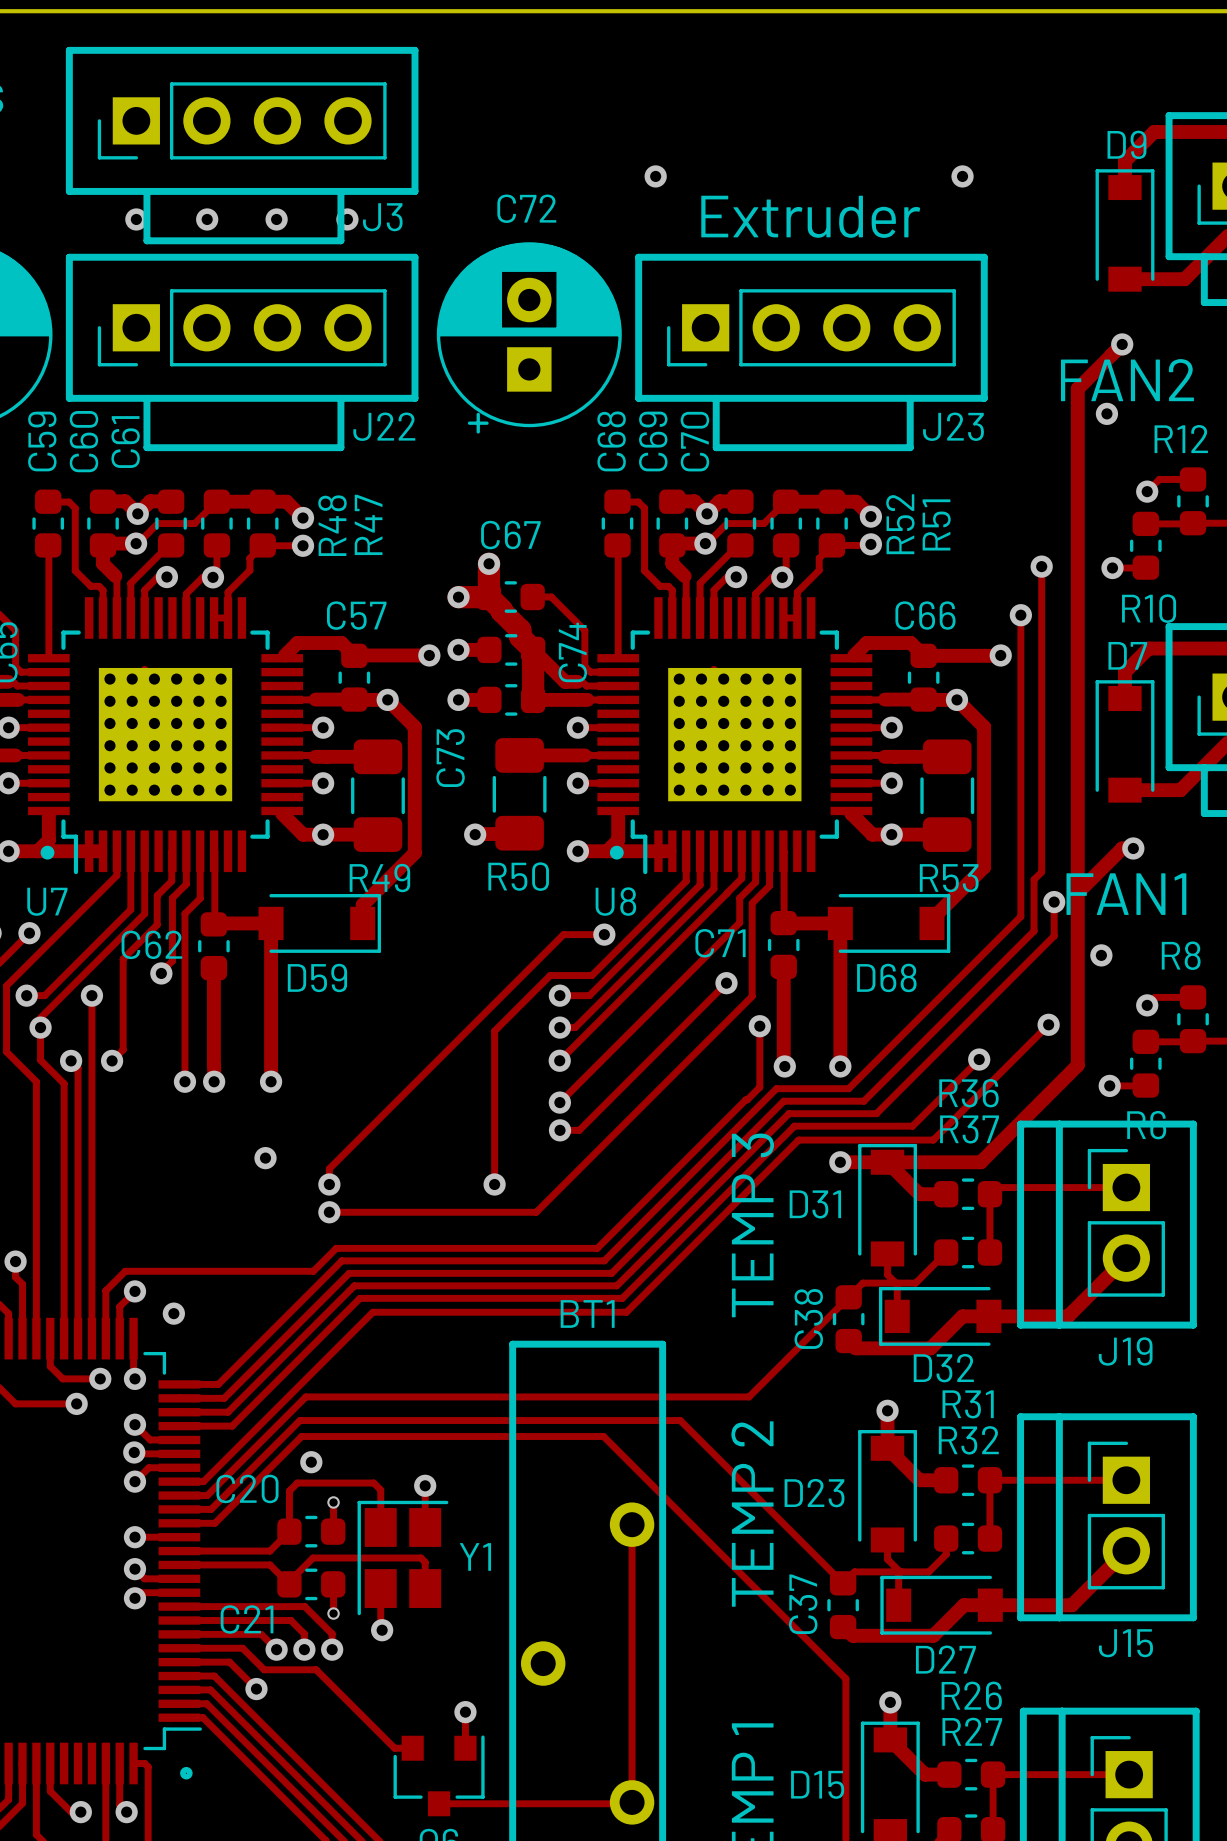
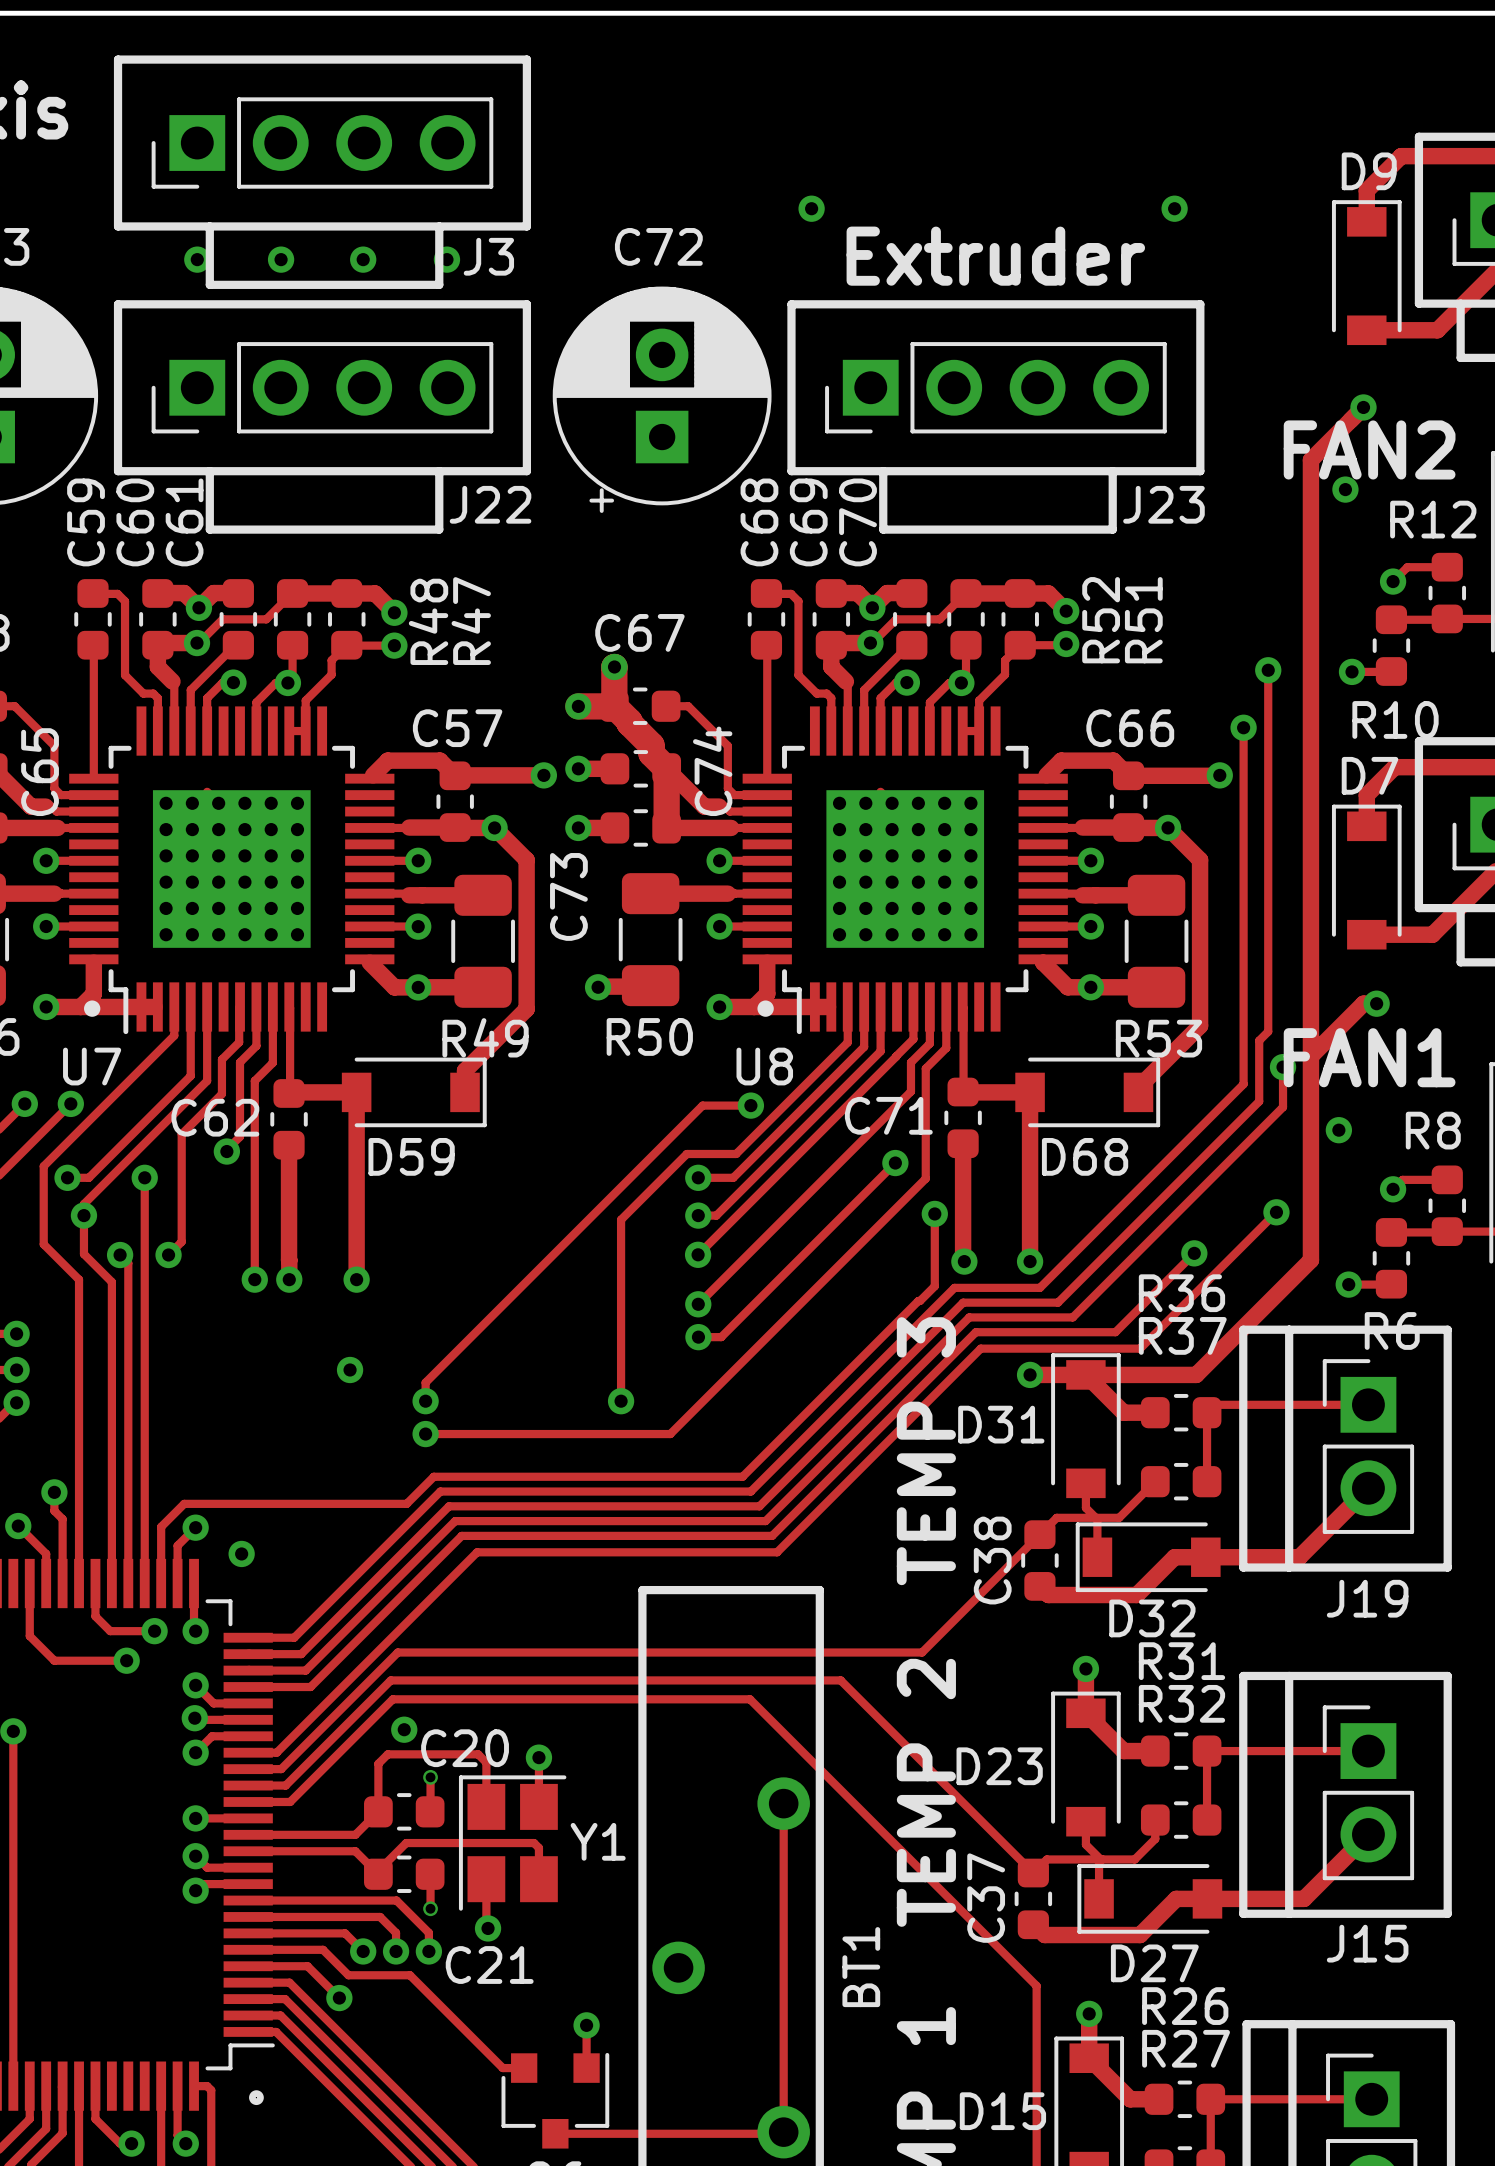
BT1 name rotation: 0° (587, 1313) -> 90° counterclockwise (861, 1967)
BT1 name position: BT1 (587, 1313) -> BT1 (861, 1967)
C20 name position: C20 (247, 1488) -> C20 (465, 1748)
C21 name position: C21 (247, 1619) -> C21 (489, 1965)

